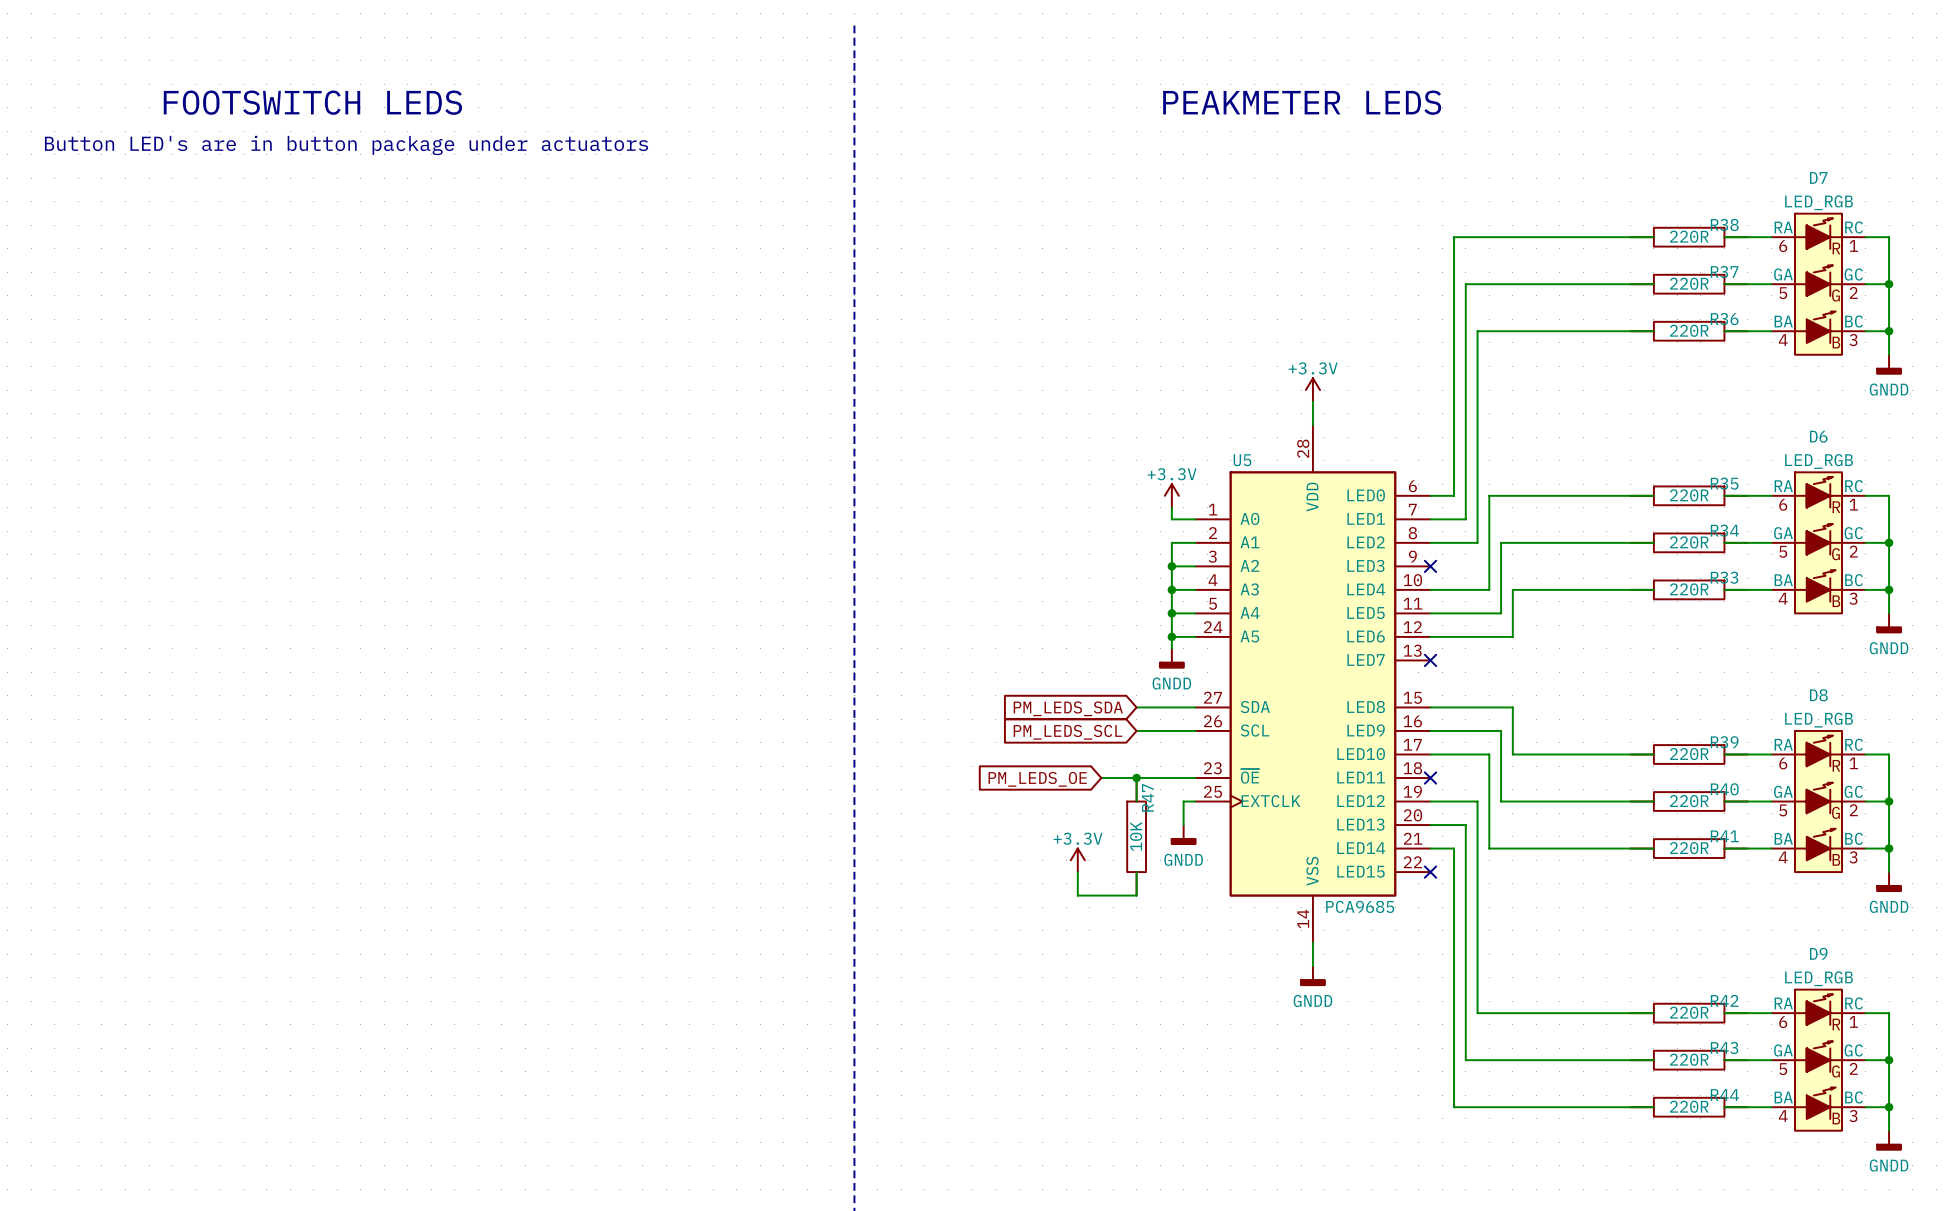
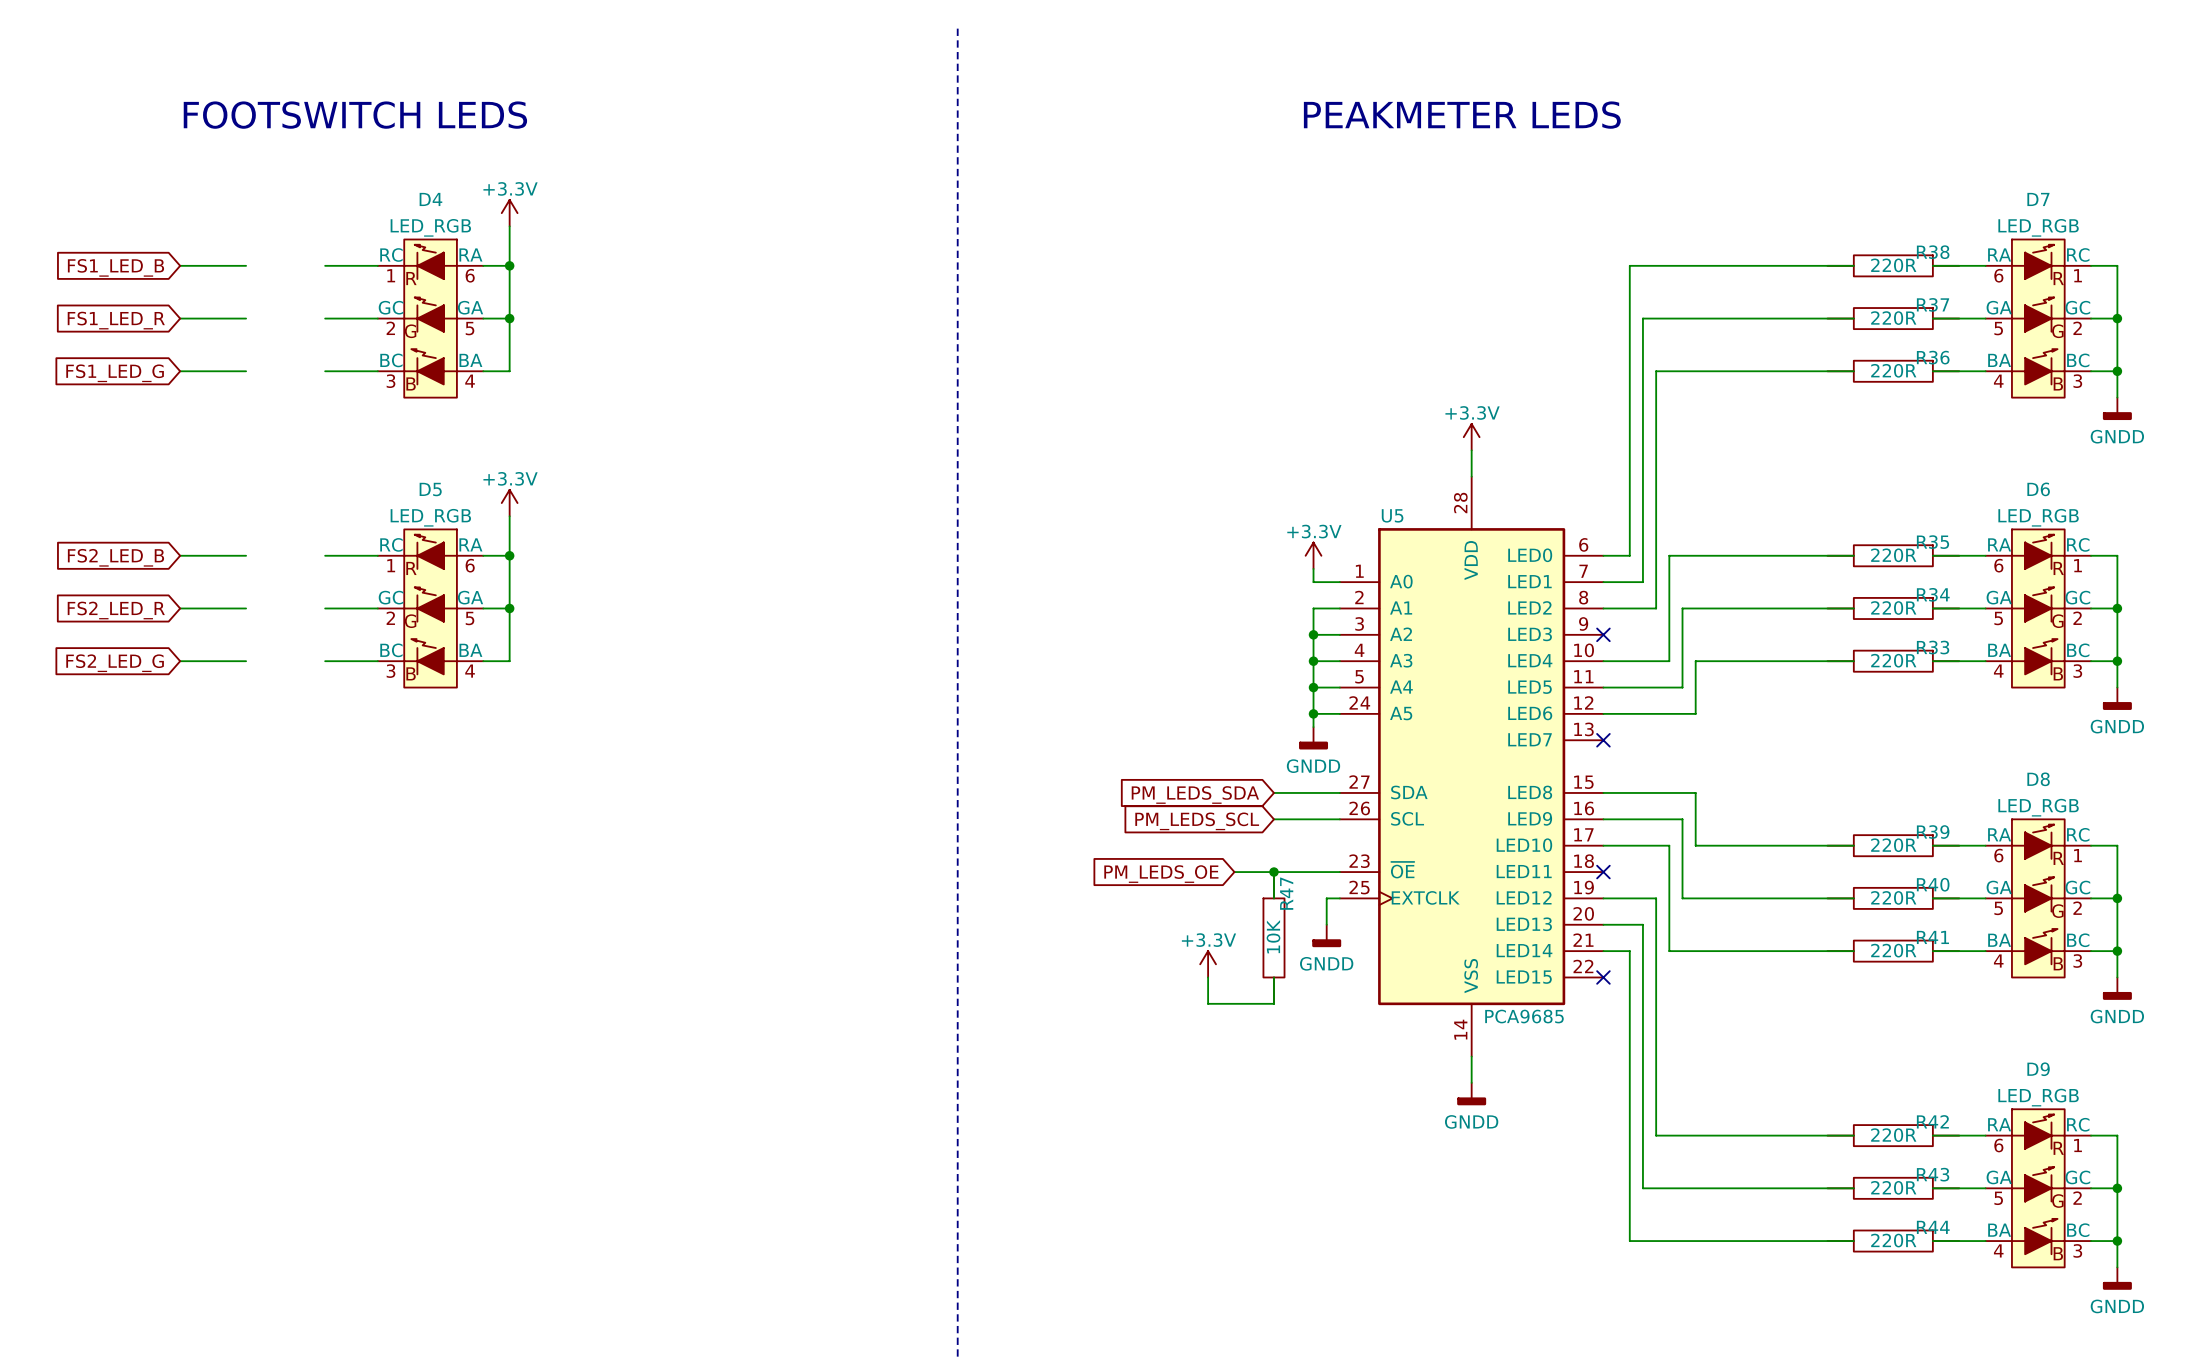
text: Button LED's are in button package under actuators (346, 145) -> none
power symbol: none -> +3.3V (509, 213)
wire: none -> (509, 226) (509, 371) (483, 371)
wire: none -> (180, 265) (246, 265)
wire: none -> (325, 265) (377, 265)
wire: none -> (483, 265) (509, 265)
junction: none -> (509, 265)
global label: none -> FS1_LED_B (115, 267)
wire: none -> (180, 318) (246, 318)
wire: none -> (325, 318) (377, 318)
D4: none -> LED_RGB (430, 318)
wire: none -> (483, 318) (509, 318)
junction: none -> (509, 318)
global label: none -> FS1_LED_R (116, 320)
wire: none -> (180, 371) (246, 371)
wire: none -> (325, 371) (377, 371)
global label: none -> FS1_LED_G (115, 373)
power symbol: none -> +3.3V (509, 503)
wire: none -> (509, 516) (509, 661) (483, 661)
wire: none -> (180, 555) (246, 555)
wire: none -> (325, 555) (377, 555)
wire: none -> (483, 555) (509, 555)
junction: none -> (509, 555)
global label: none -> FS2_LED_B (115, 557)
wire: none -> (180, 608) (246, 608)
wire: none -> (325, 608) (377, 608)
D5: none -> LED_RGB (430, 608)
wire: none -> (483, 608) (509, 608)
junction: none -> (509, 608)
global label: none -> FS2_LED_R (116, 610)
wire: none -> (180, 661) (246, 661)
wire: none -> (325, 661) (377, 661)
global label: none -> FS2_LED_G (115, 663)

